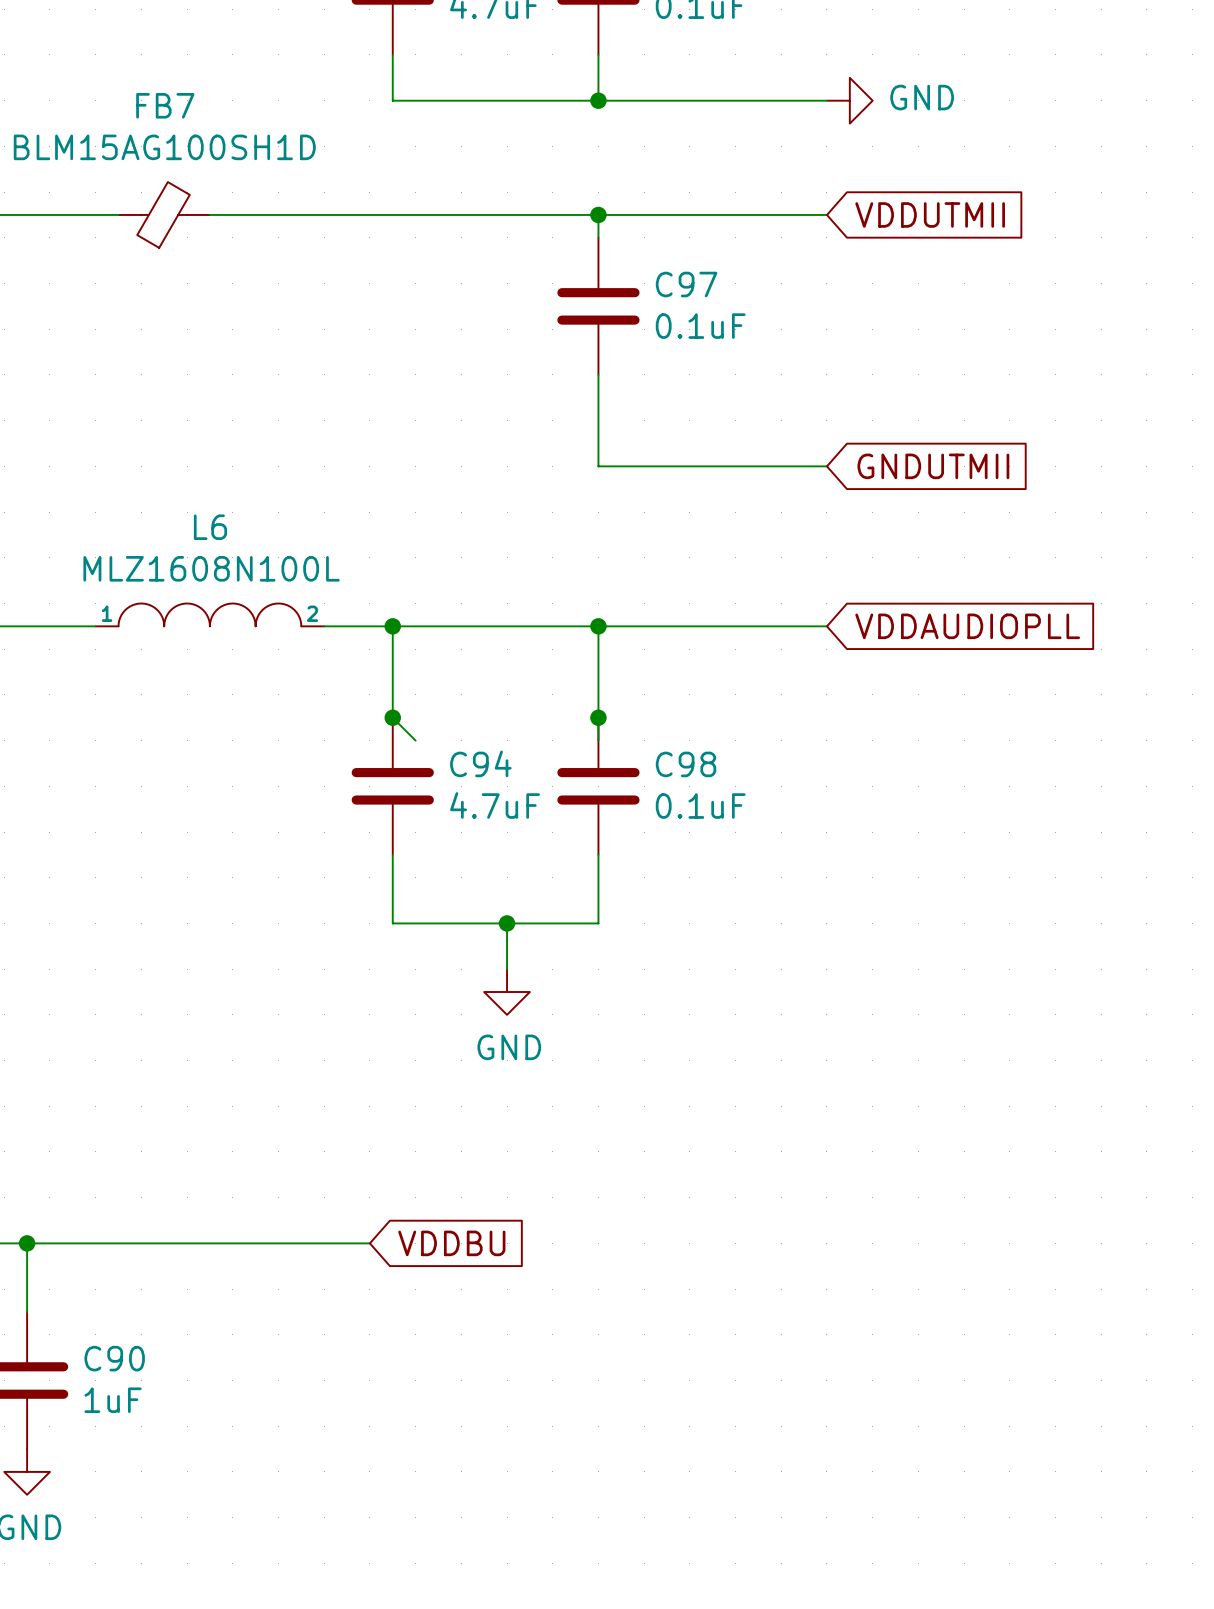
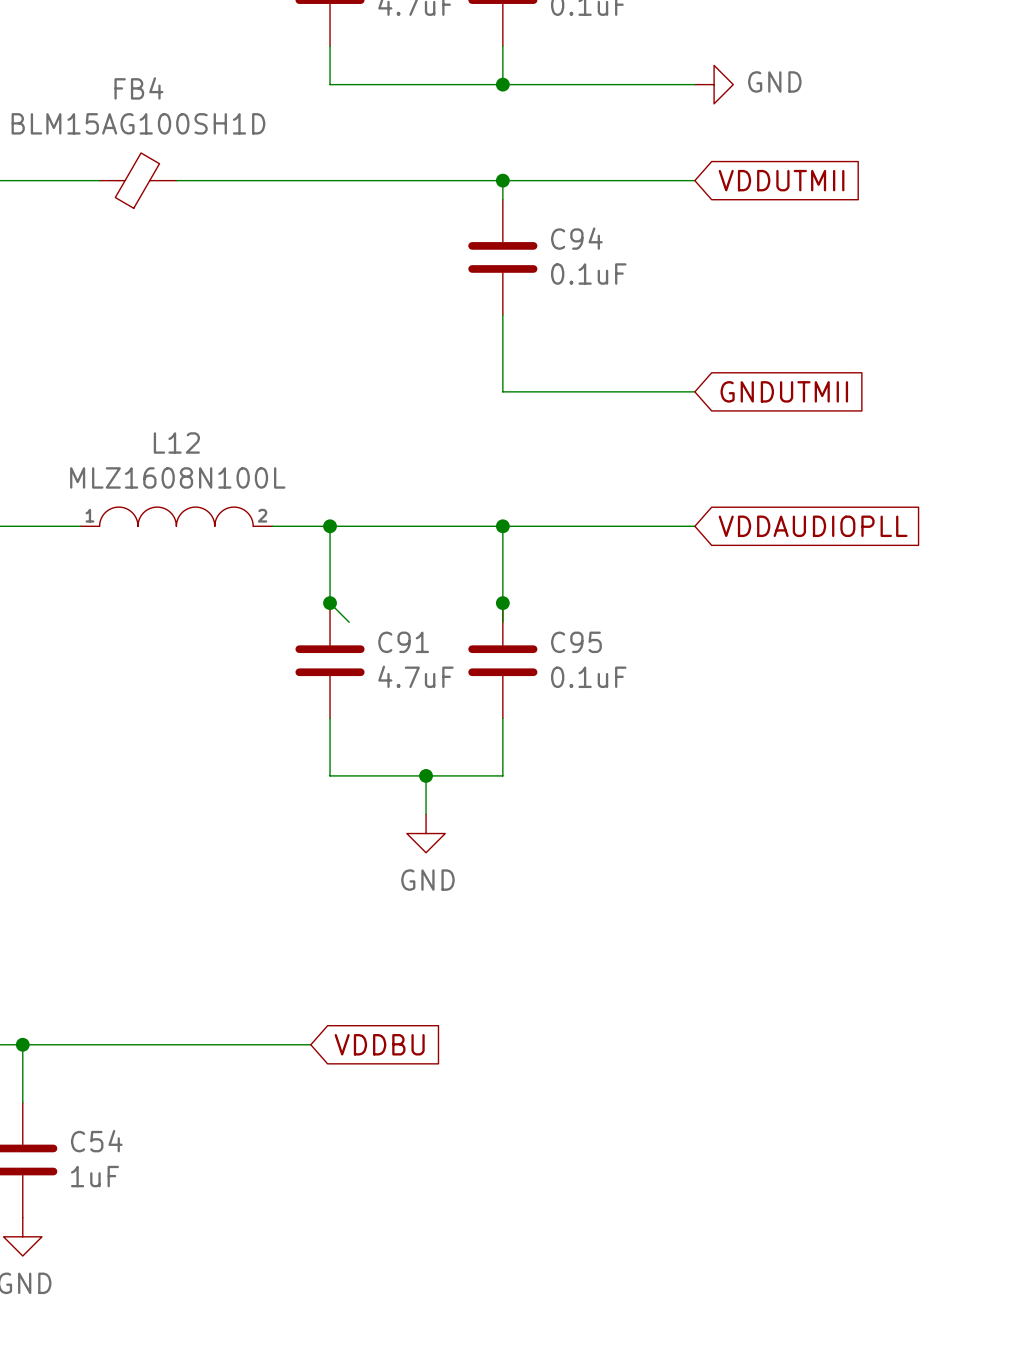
FB7 name: FB7 (165, 105) -> FB4 (138, 88)
C97 name: C97 (686, 284) -> C94 (576, 238)
L6 name: L6 (210, 527) -> L12 (176, 443)
C94 name: C94 (480, 763) -> C91 (403, 642)
C98 name: C98 (686, 764) -> C95 (576, 642)
C90 name: C90 (114, 1358) -> C54 (96, 1141)

